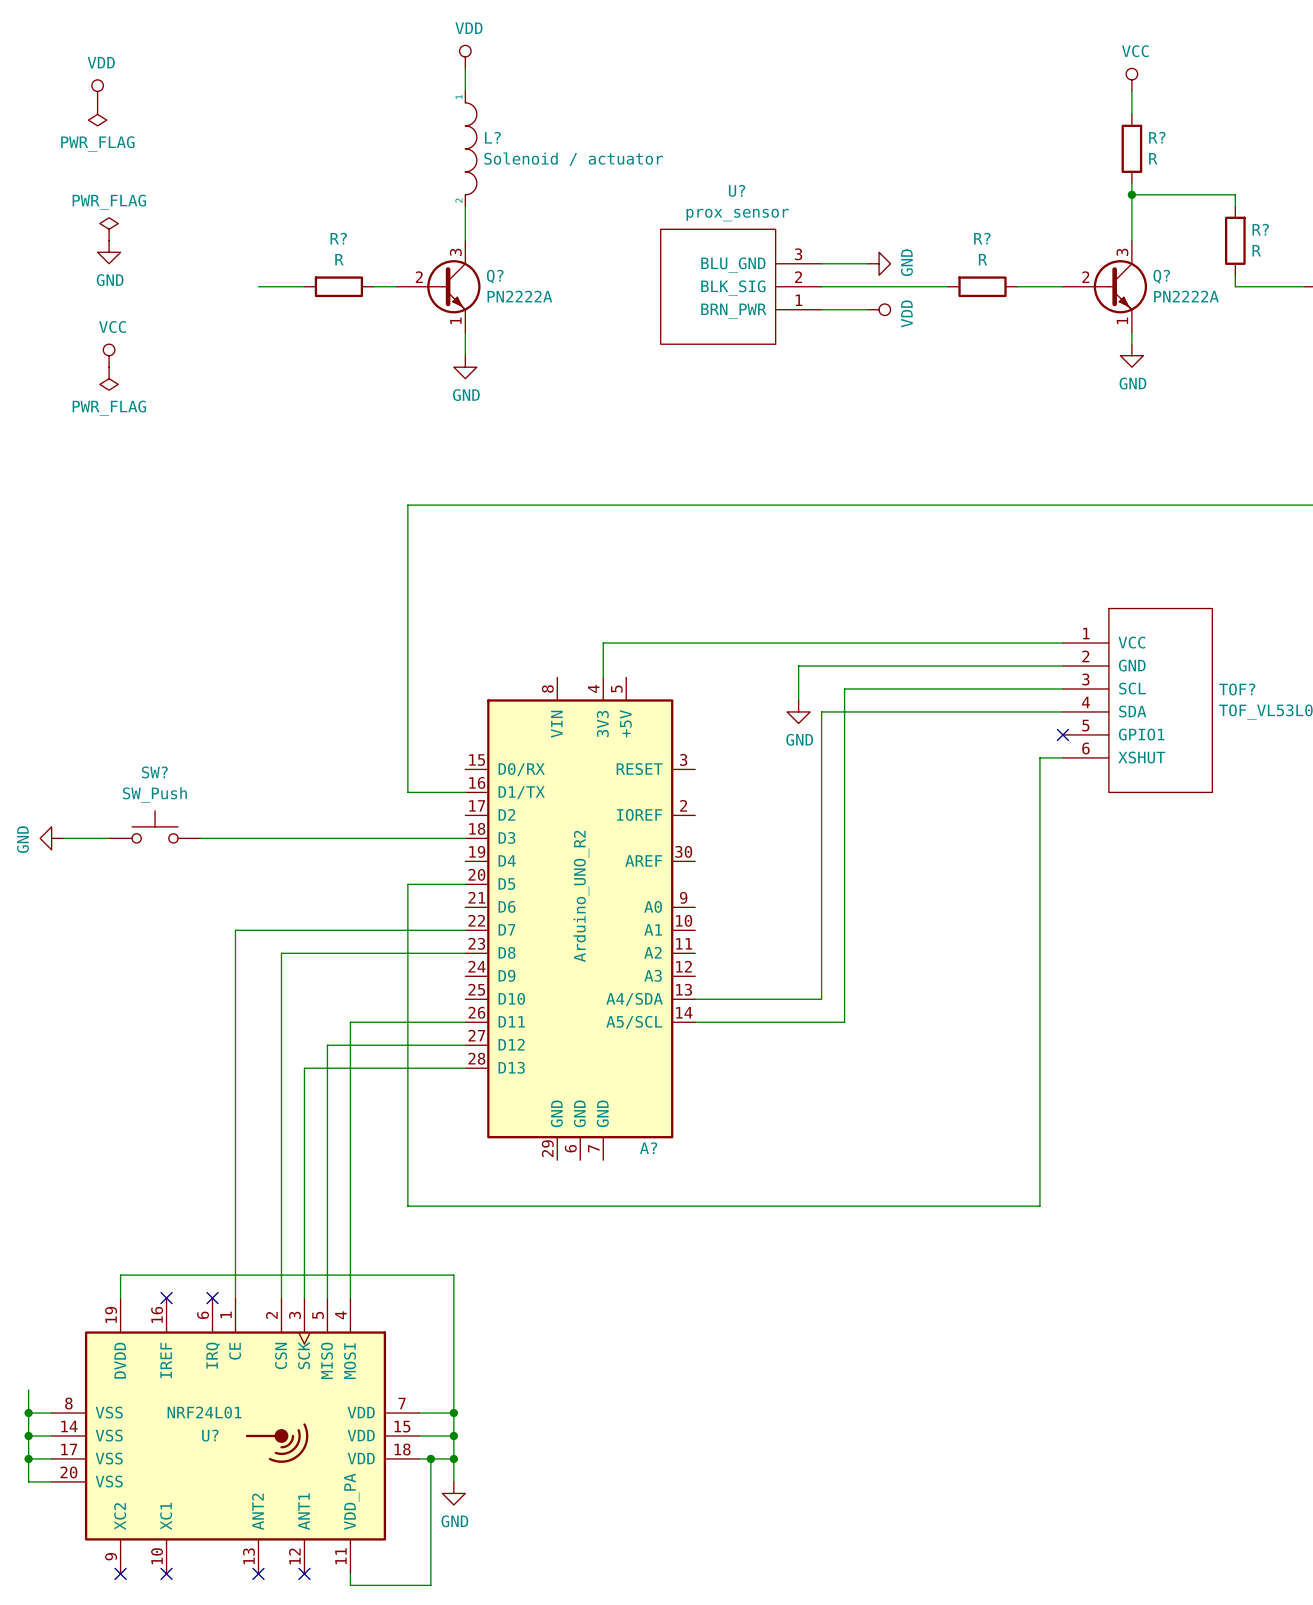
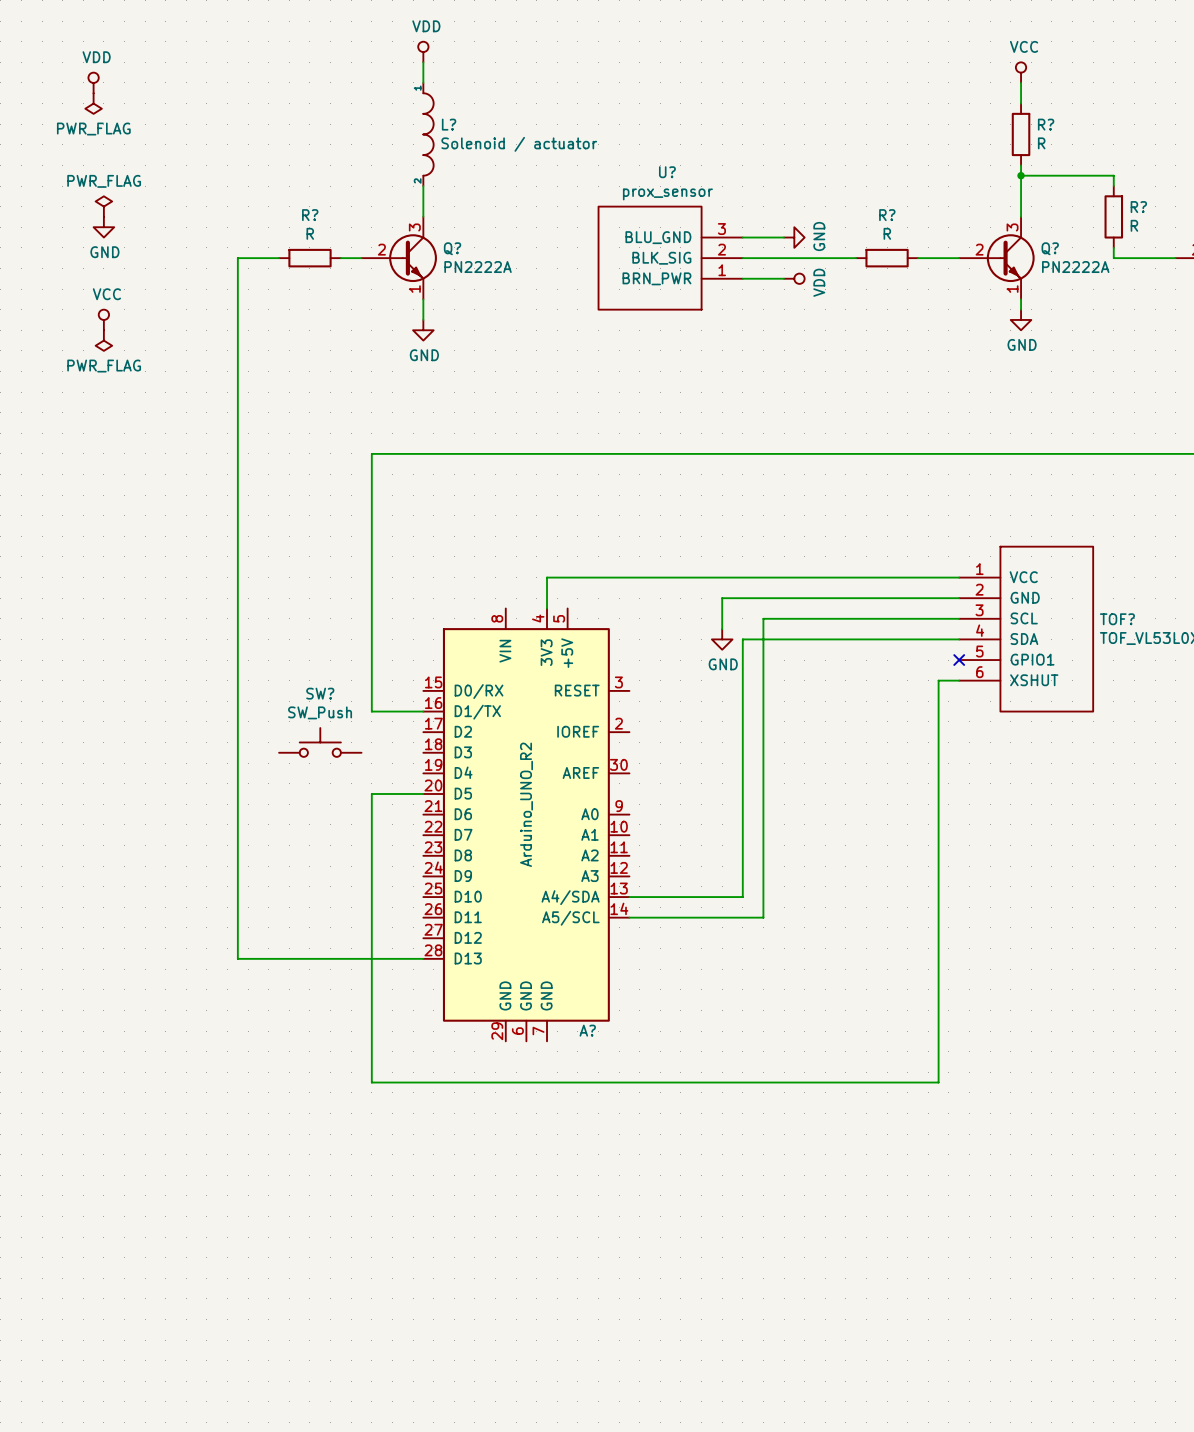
SW? position: (155, 826) -> (320, 742)
power symbol: GND (51, 838) -> none
wire: (63, 838) (109, 838) -> none
wire: (201, 838) (465, 838) -> none
wire: (465, 930) (235, 930) (235, 1298) -> none
wire: (465, 953) (281, 953) (281, 1298) -> none
wire: (465, 1022) (350, 1022) (350, 1298) -> none
wire: (465, 1045) (327, 1045) (327, 1298) -> none
wire: (304, 1068) (304, 1298) -> (279, 958) (237, 958) (237, 258)
wire: (120, 1298) (120, 1275) (453, 1275) (453, 1481) -> none
no-connect mark: (166, 1298) -> none
no-connect mark: (212, 1298) -> none
wire: (28, 1390) (28, 1481) (51, 1481) -> none
wire: (28, 1413) (51, 1413) -> none
junction: (28, 1413) -> none
wire: (419, 1413) (453, 1413) -> none
junction: (453, 1413) -> none
wire: (28, 1435) (51, 1435) -> none
junction: (28, 1435) -> none
U?: NRF24L01 (235, 1435) -> none
wire: (419, 1435) (453, 1435) -> none
junction: (453, 1435) -> none
wire: (28, 1458) (51, 1458) -> none
junction: (28, 1458) -> none
wire: (419, 1458) (453, 1458) -> none
wire: (430, 1458) (430, 1585) (350, 1585) (350, 1573) -> none
junction: (430, 1458) -> none
junction: (453, 1458) -> none
power symbol: GND (453, 1493) -> none
no-connect mark: (120, 1573) -> none
no-connect mark: (166, 1573) -> none
no-connect mark: (258, 1573) -> none
no-connect mark: (304, 1573) -> none

